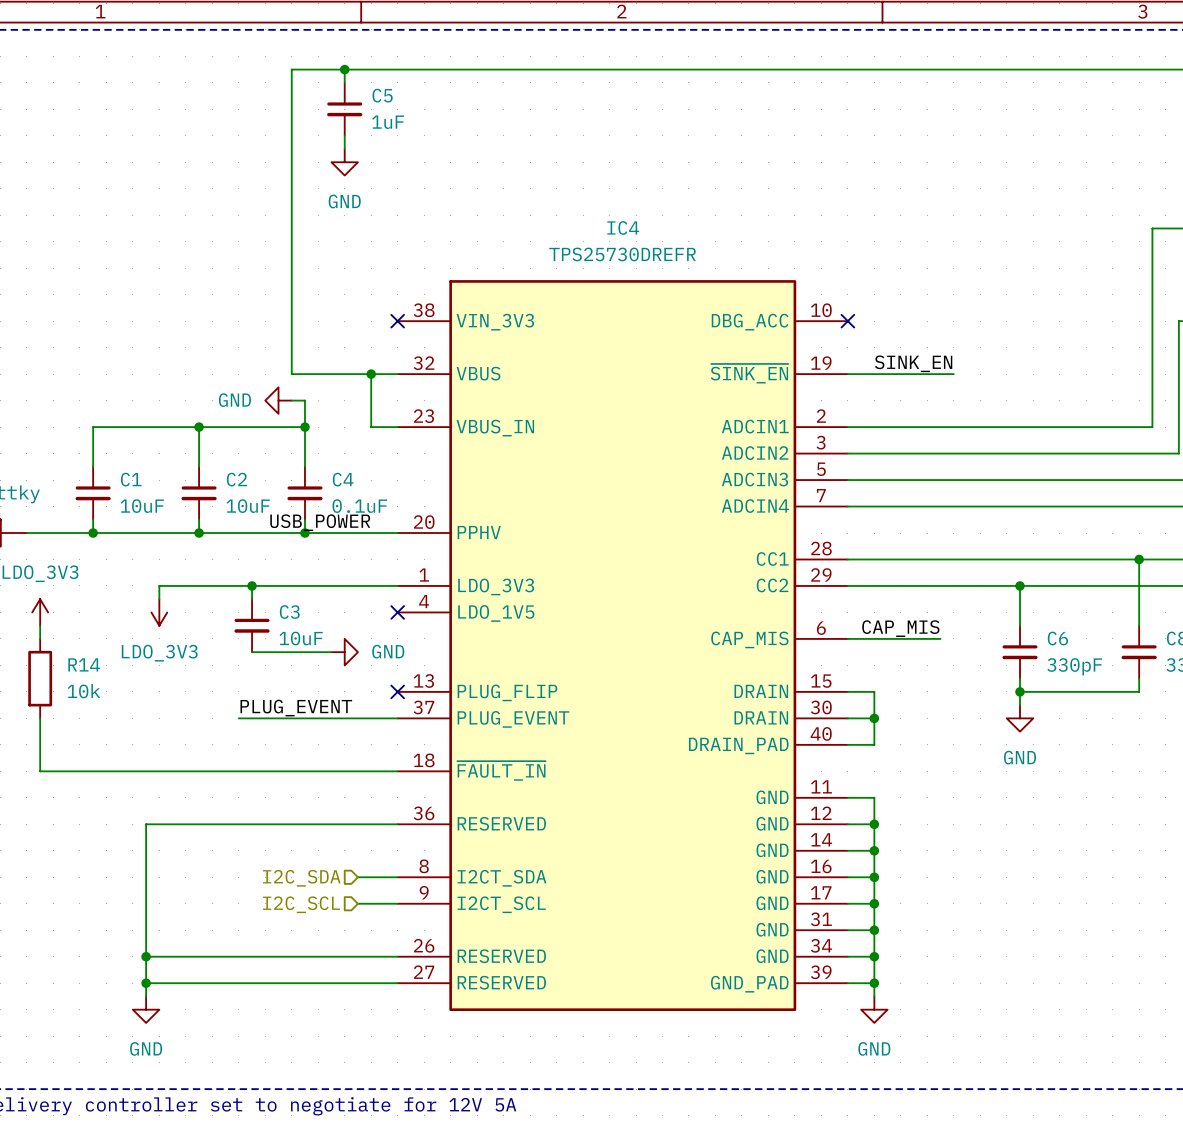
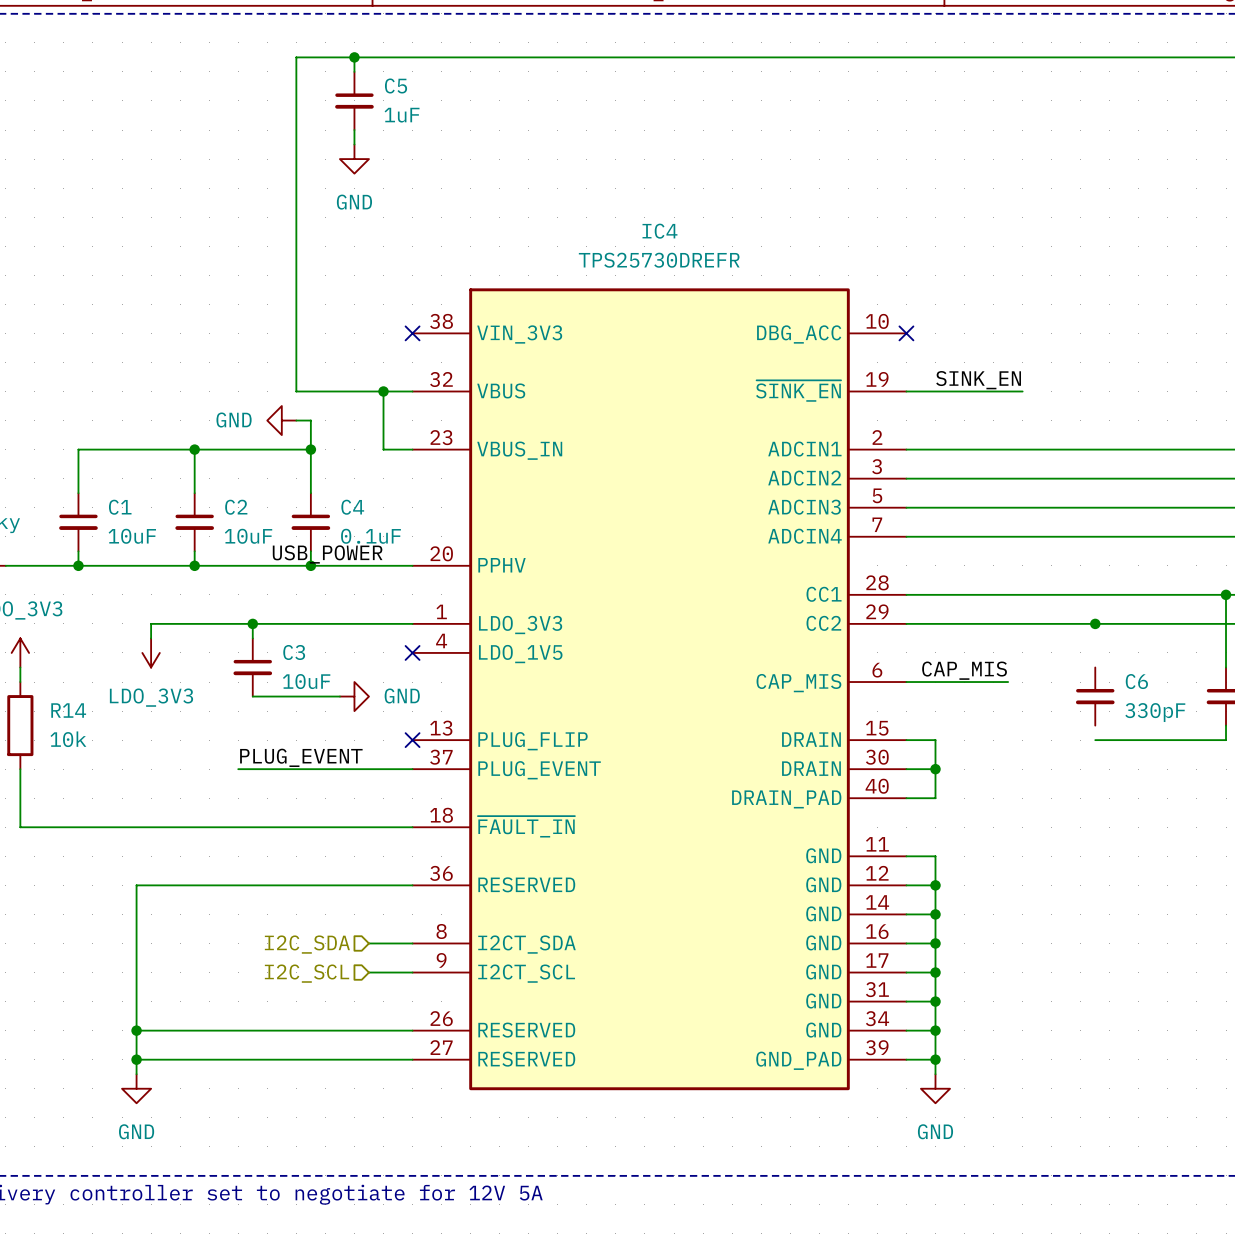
wire: (1020, 585) (1020, 625) -> none
wire: (1020, 678) (1020, 705) -> none
junction: (1020, 691) -> none
power symbol: GND (1020, 718) -> none

